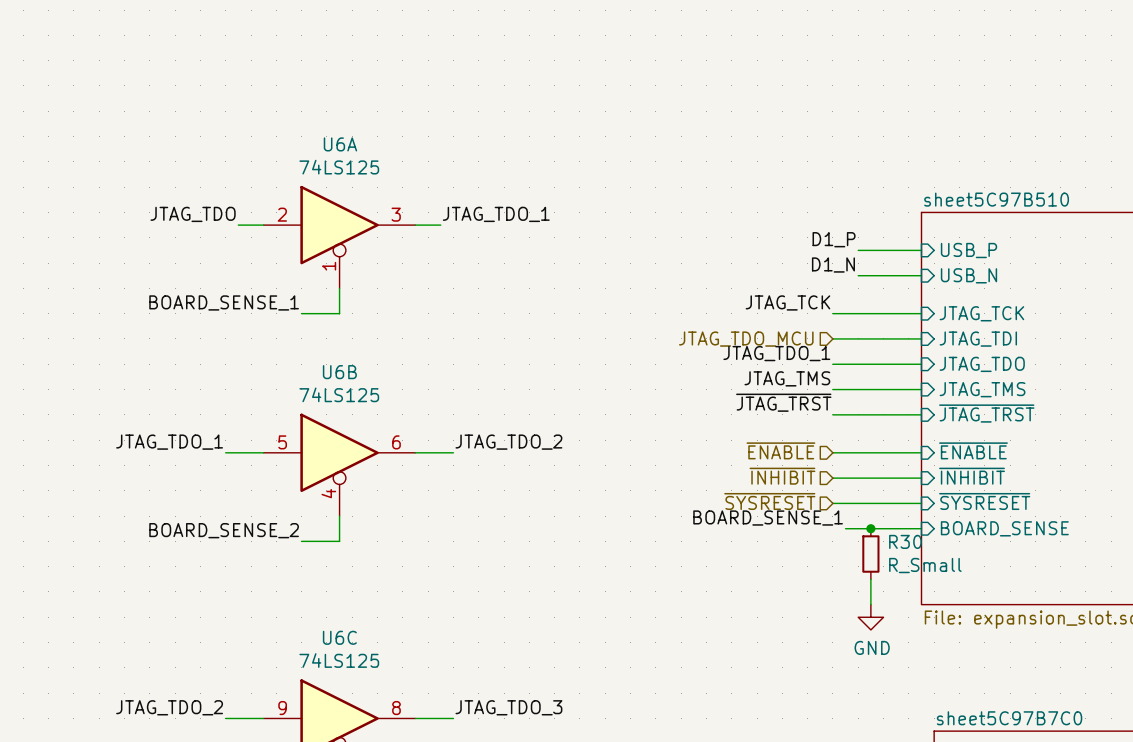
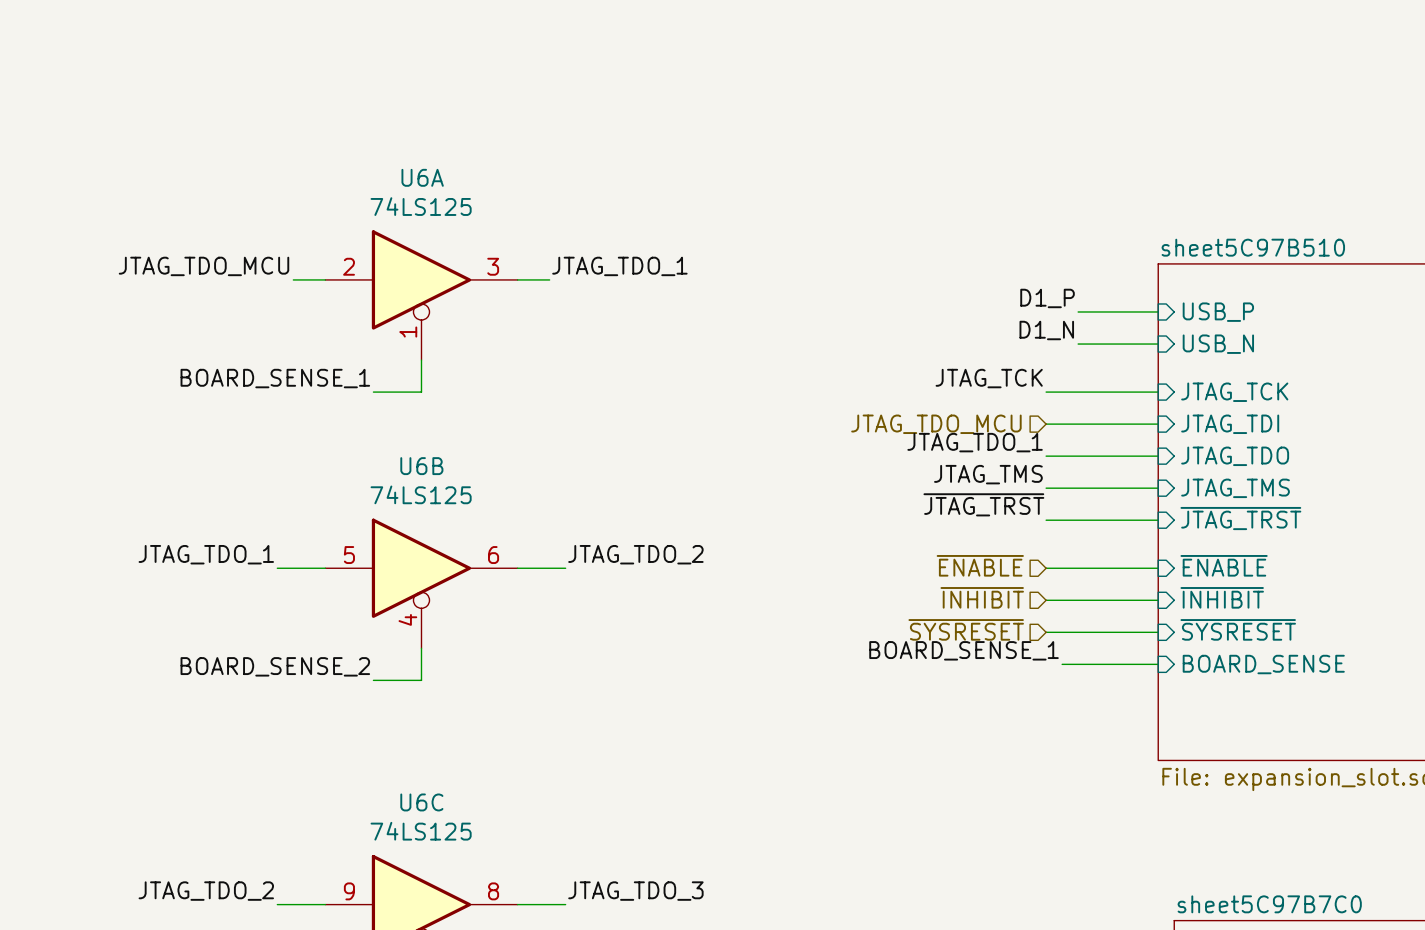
label: JTAG_TDO (193, 214) -> JTAG_TDO_MCU (204, 266)
junction: (870, 528) -> none
R30: R_Small (870, 554) -> none
wire: (870, 579) (870, 604) -> none
power symbol: GND (870, 617) -> none

